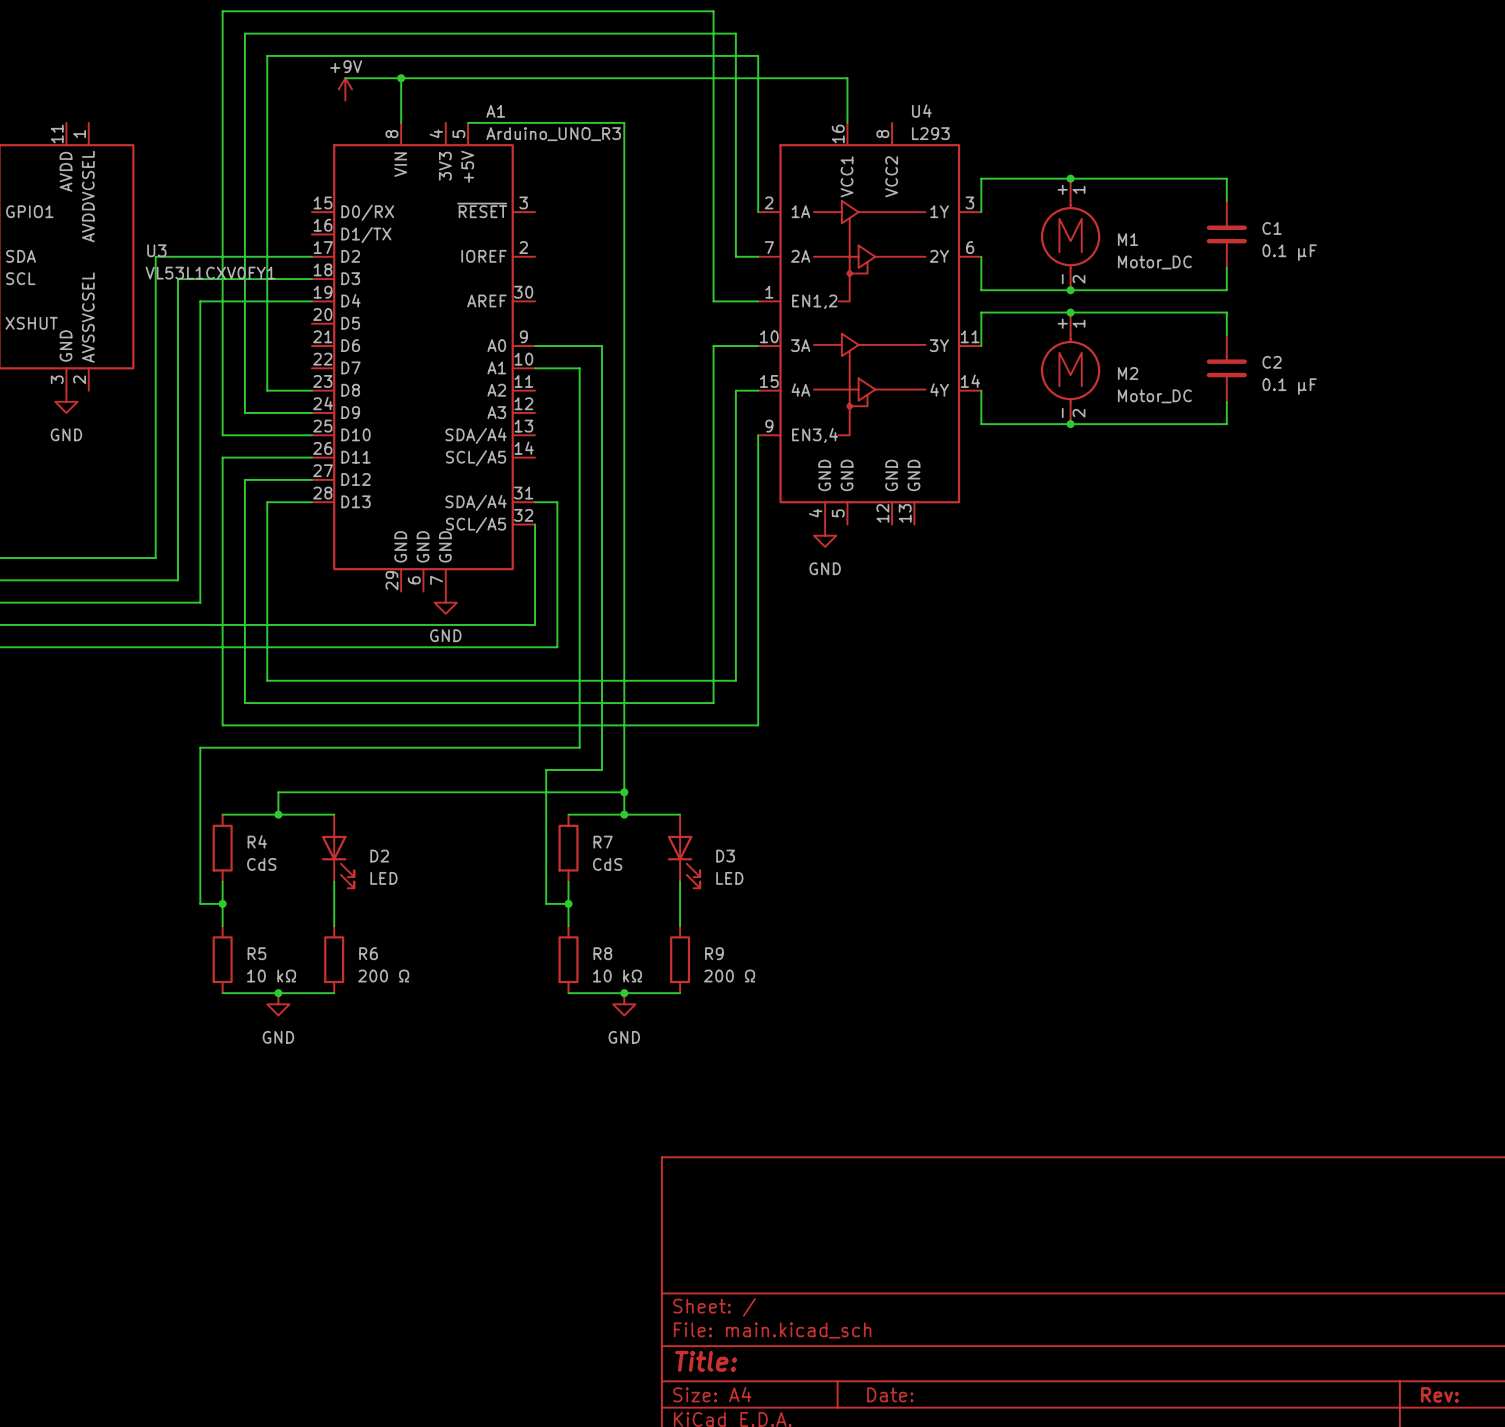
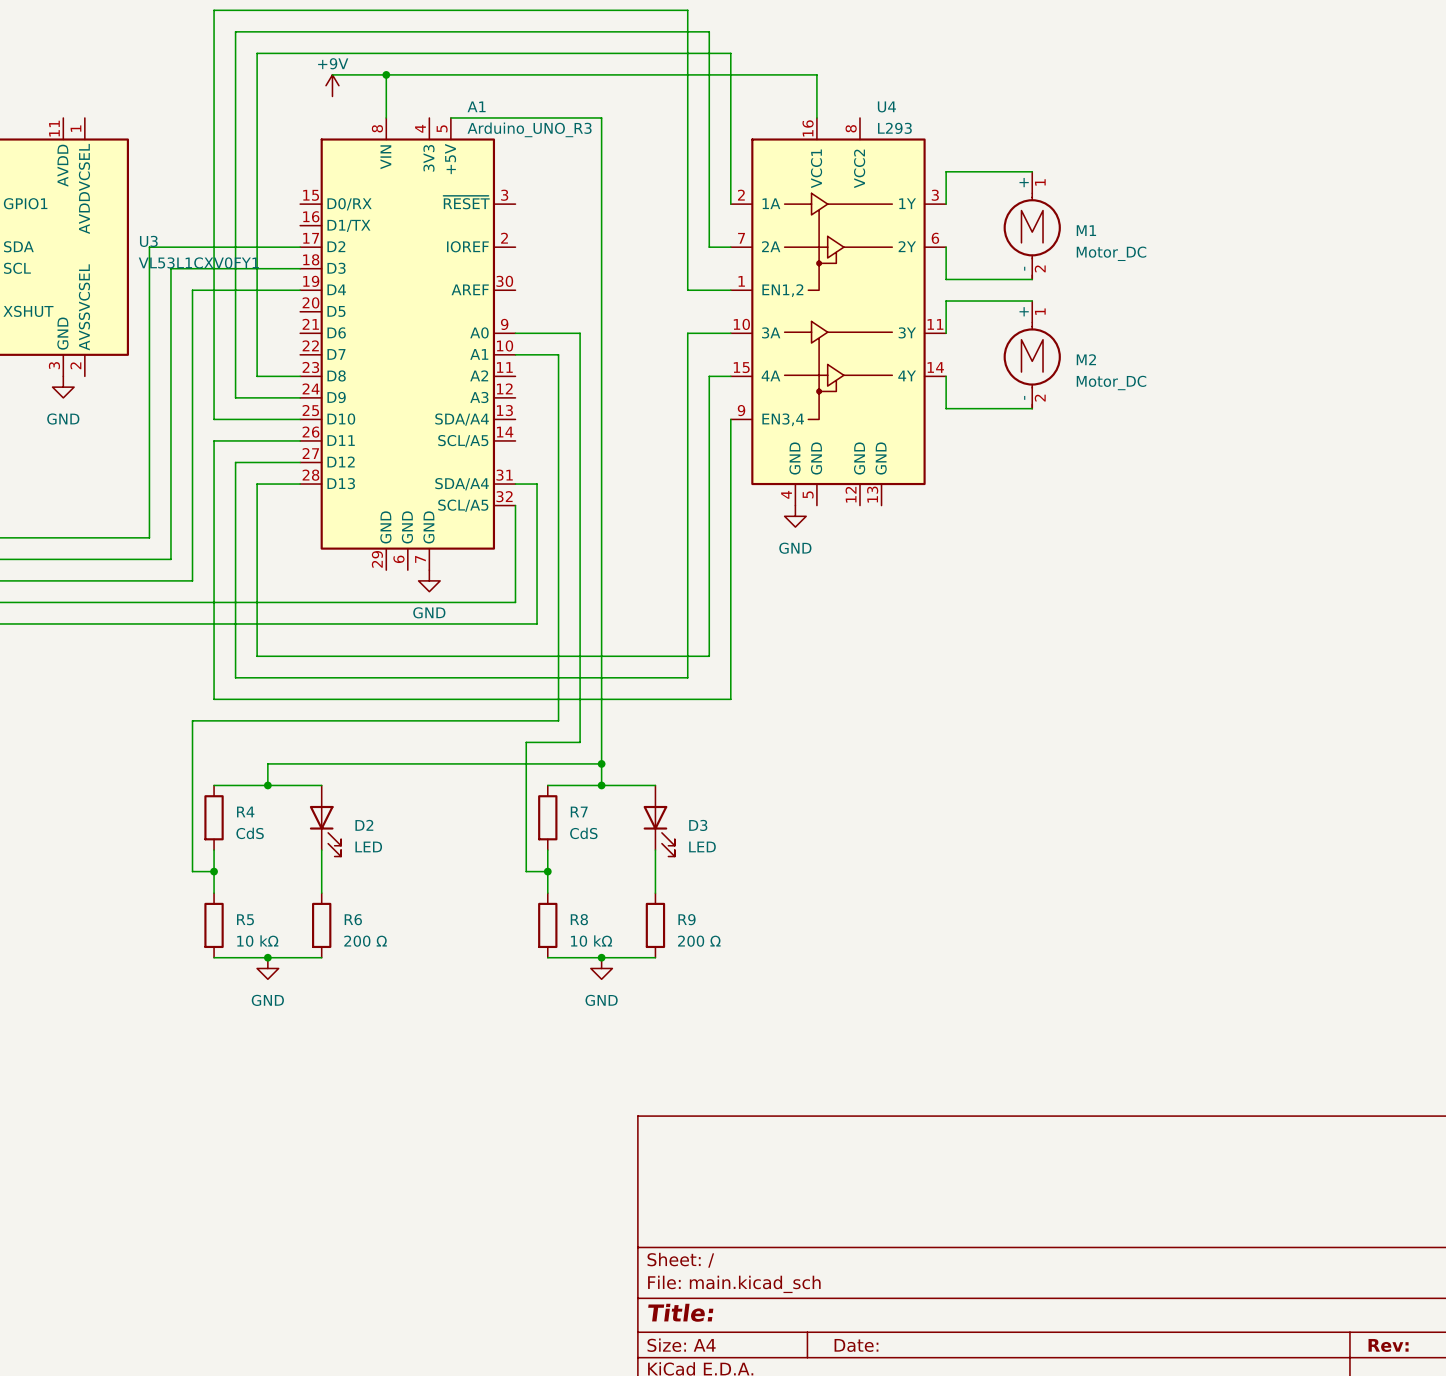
wire: (1070, 178) (1226, 178) (1226, 200) -> none
junction: (1070, 178) -> none
C1: 0.1 μF (1226, 234) -> none
wire: (1226, 267) (1226, 290) (1070, 290) -> none
junction: (1070, 290) -> none
wire: (1070, 312) (1226, 312) (1226, 334) -> none
junction: (1070, 312) -> none
C2: 0.1 μF (1226, 368) -> none
wire: (1226, 401) (1226, 424) (1070, 424) -> none
junction: (1070, 424) -> none

